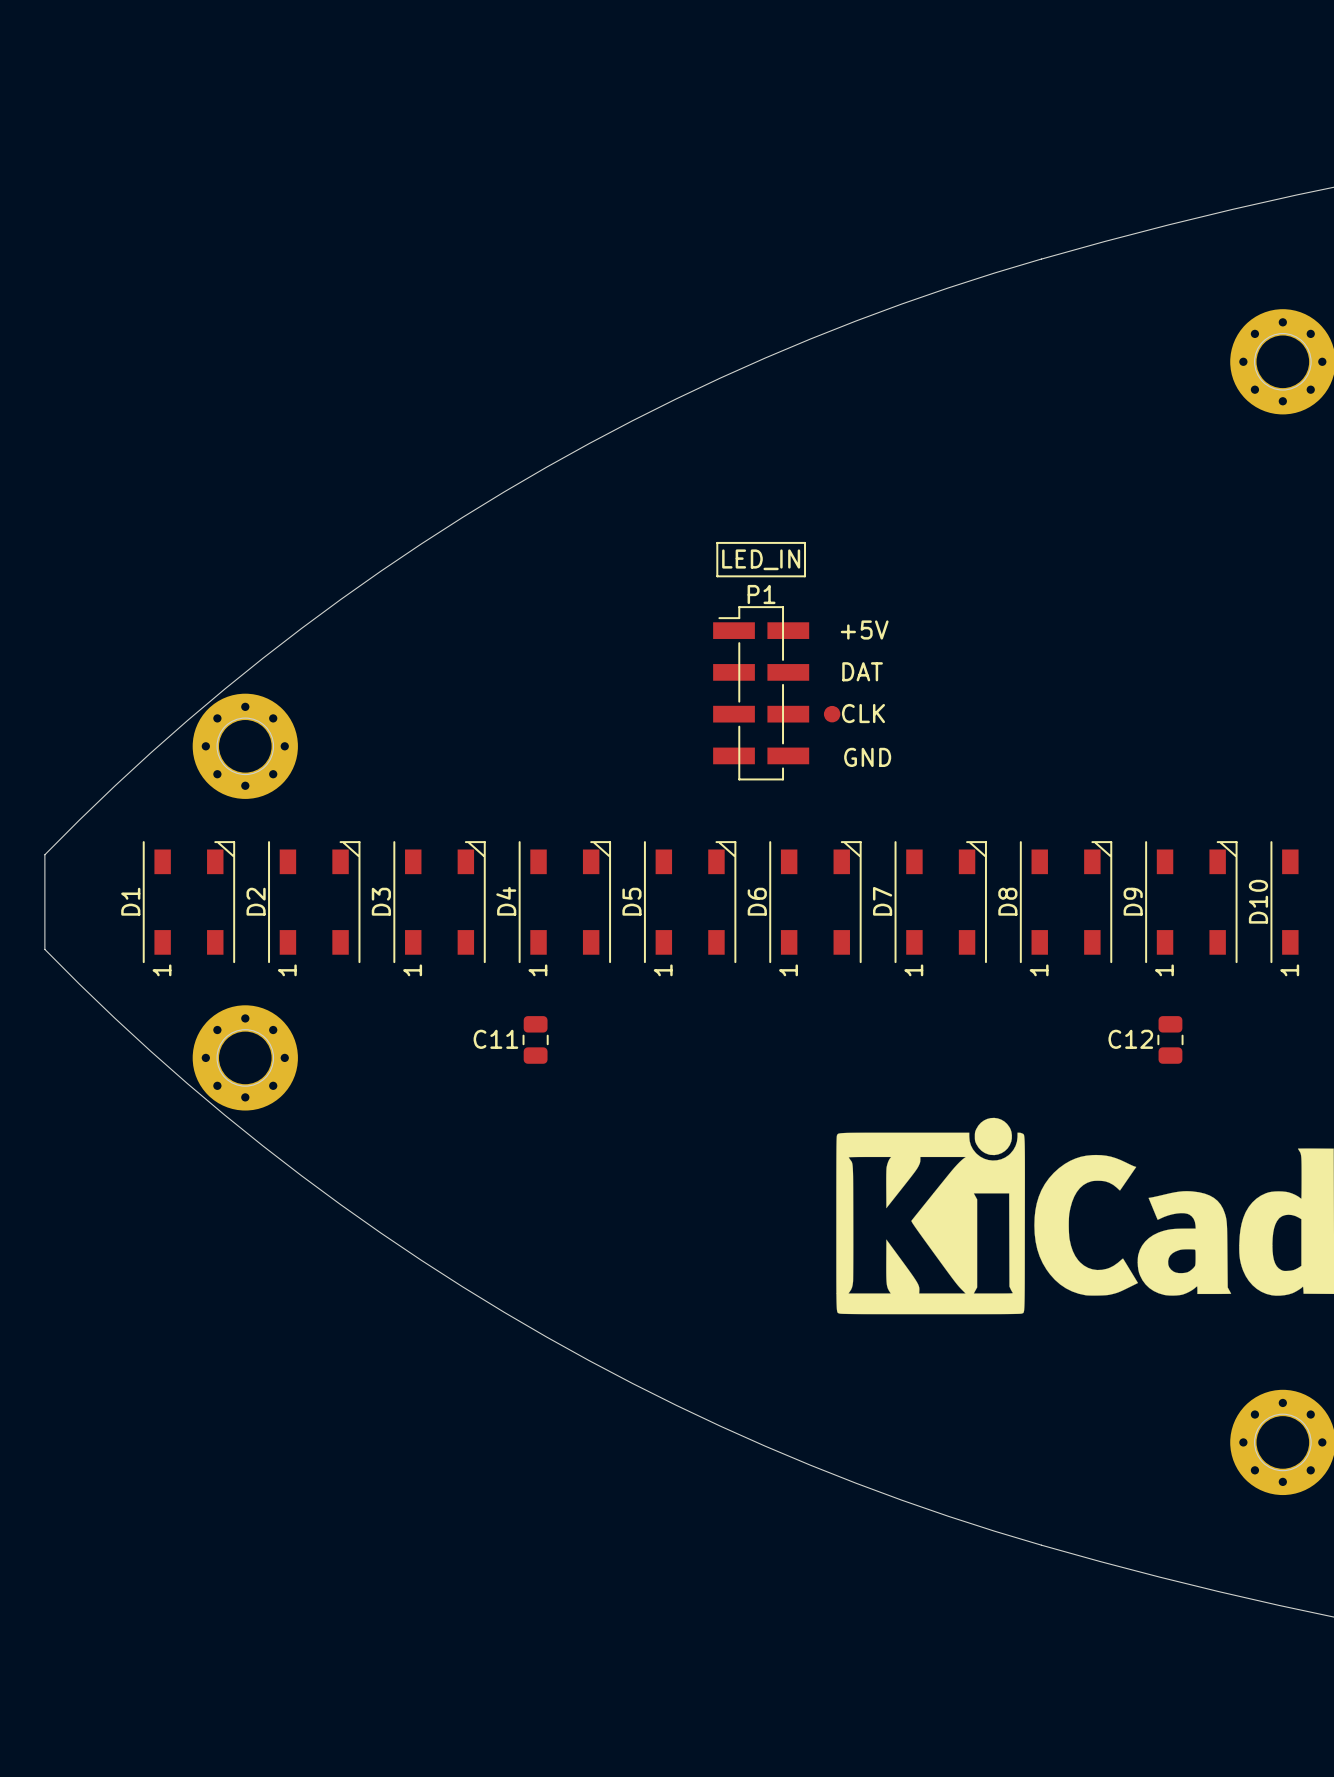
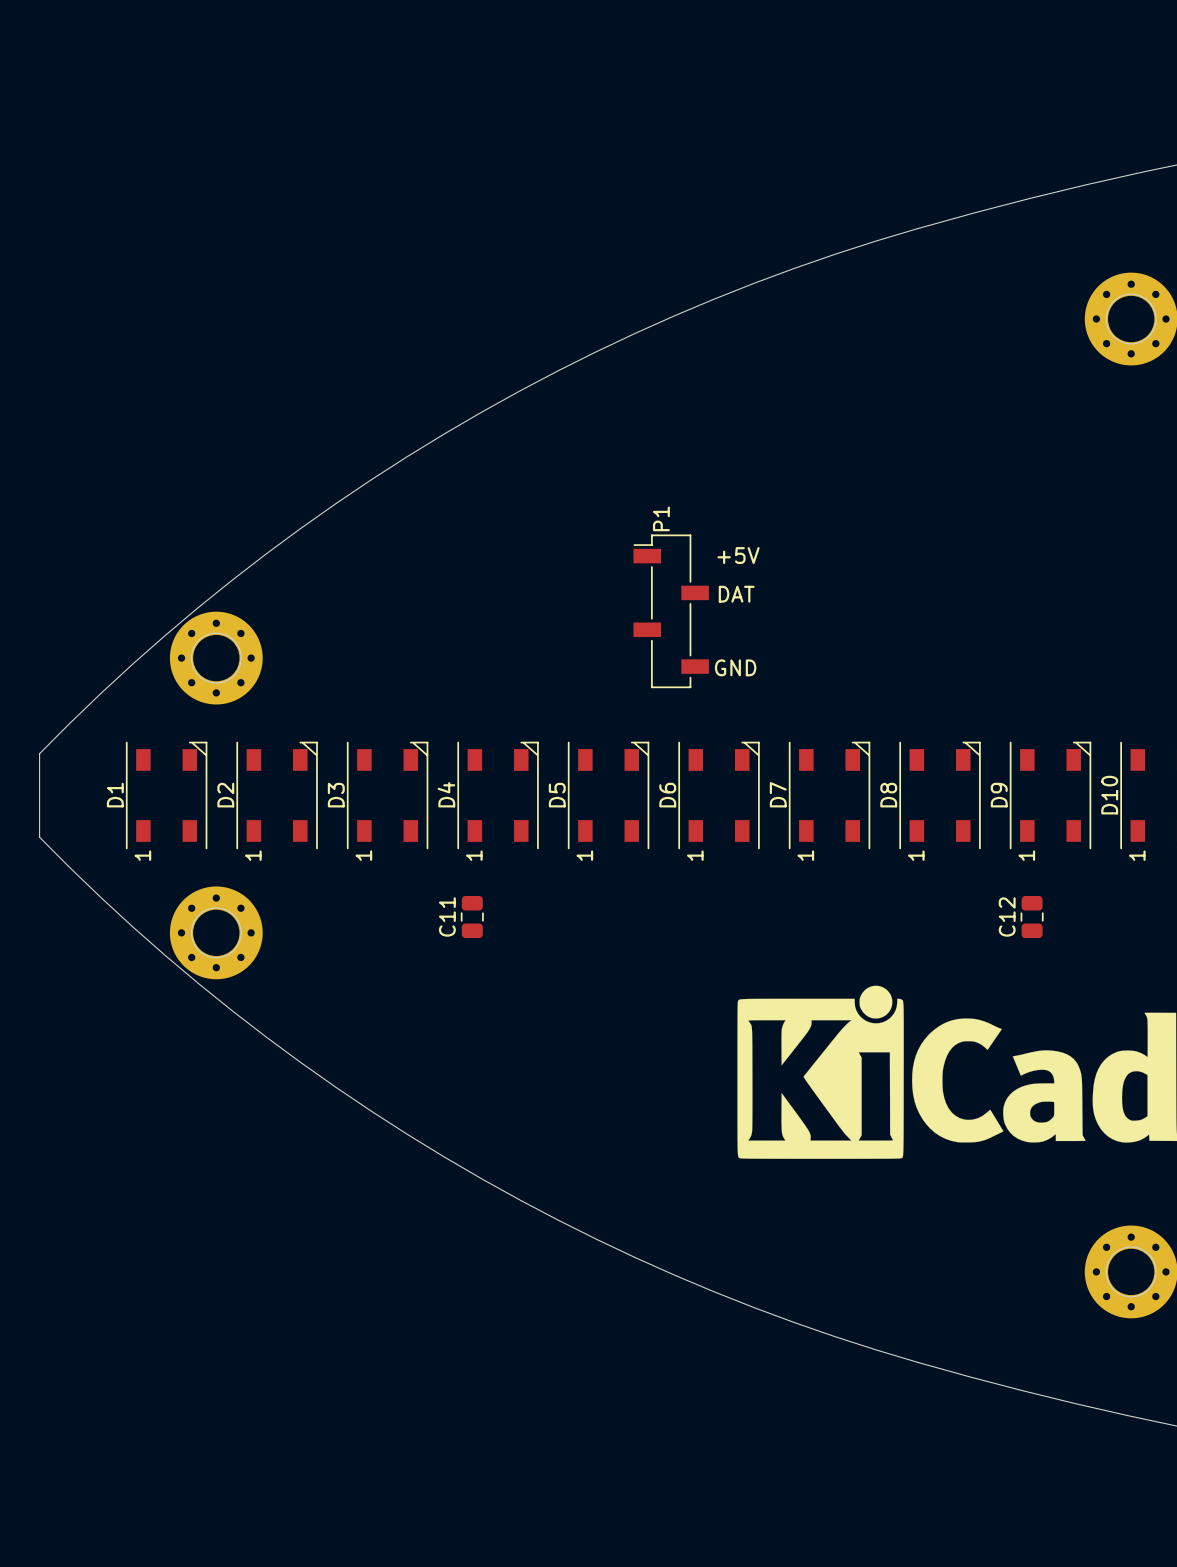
line: (717, 542) (717, 576) (805, 576) (805, 542) (717, 542) -> none
P1 value: LED_IN (761, 559) -> none
P1 footprint: [713, 606, 810, 781] -> [633, 534, 709, 689]
part: (832, 714) -> none
C11 name rotation: 0° (495, 1039) -> 90° counterclockwise (447, 917)
C12 name rotation: 0° (1130, 1039) -> 90° counterclockwise (1007, 917)

